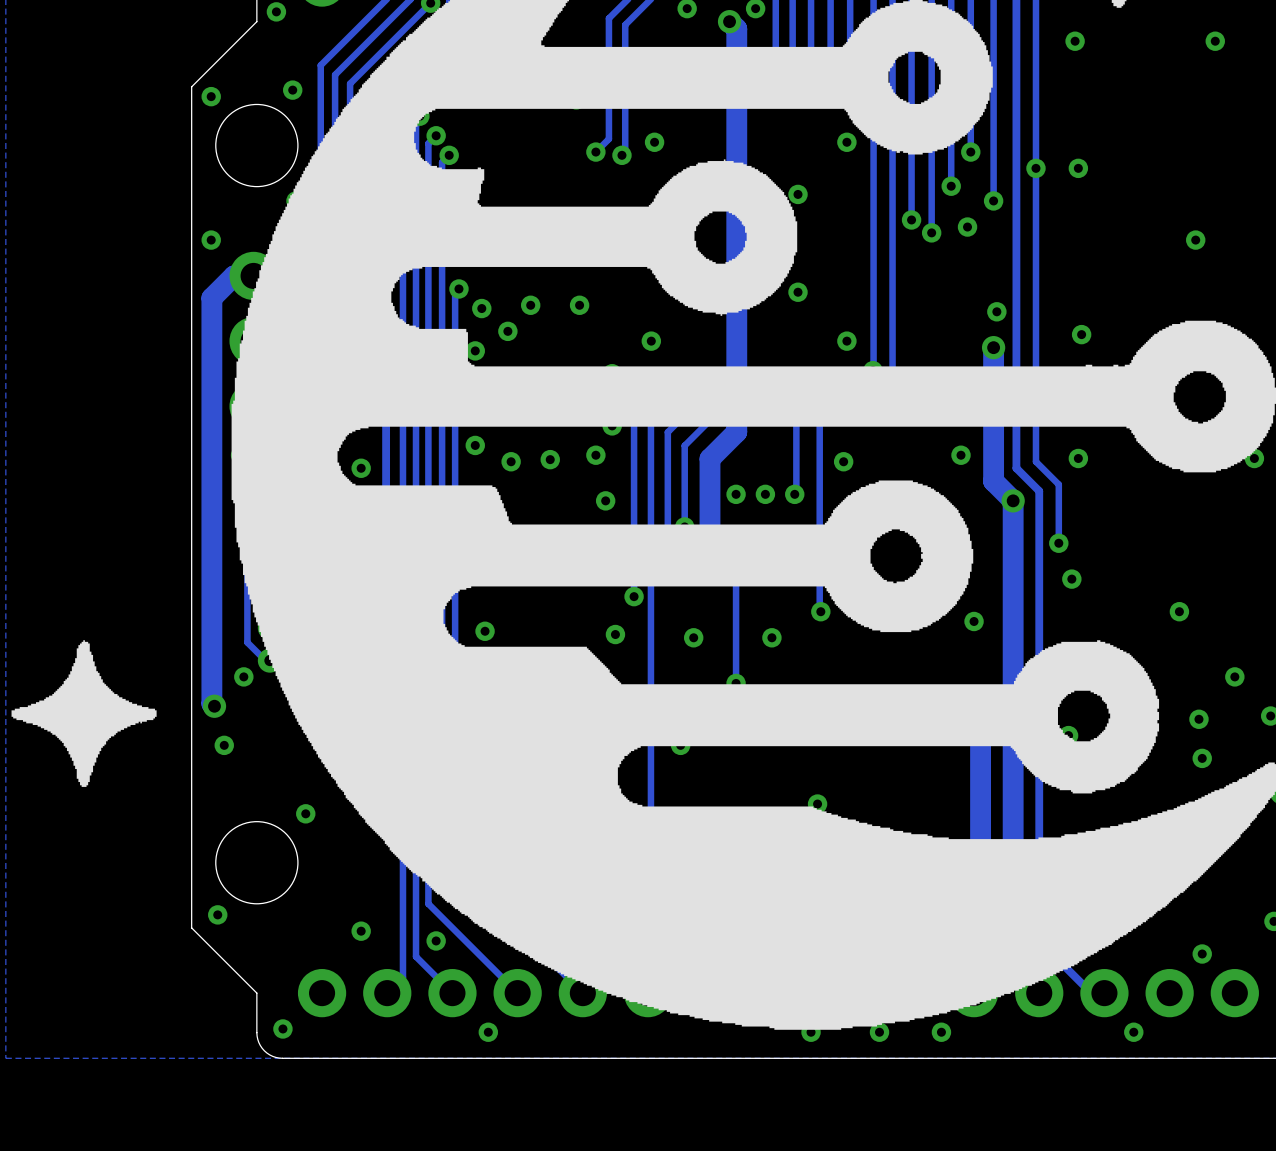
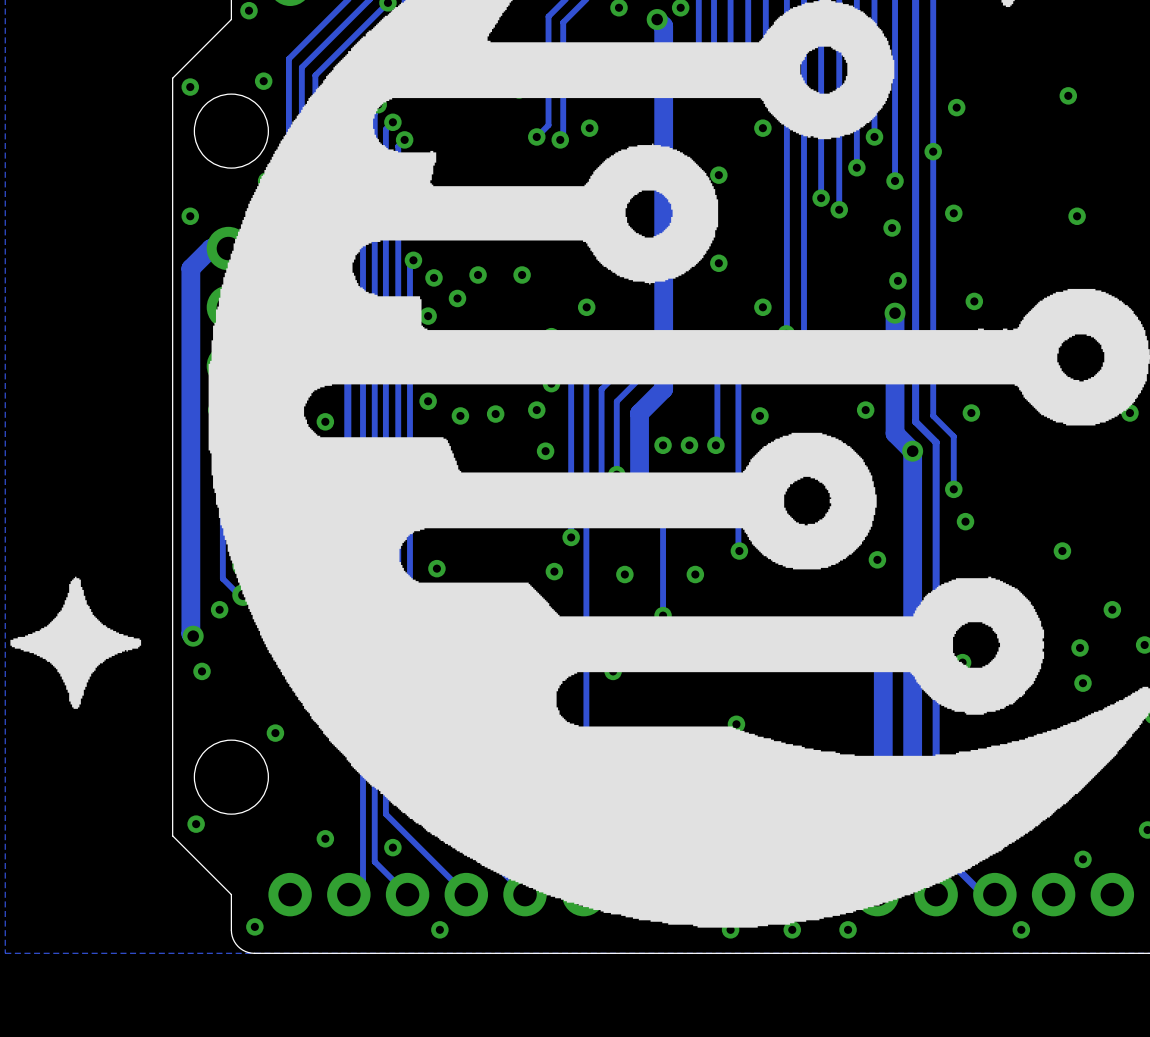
via: (1075, 41) -> none
via: (1215, 41) -> none
via: none -> (1068, 95)
via: none -> (956, 107)
via: (1078, 168) -> none
via position: (967, 227) -> (892, 228)
via: none -> (953, 213)

